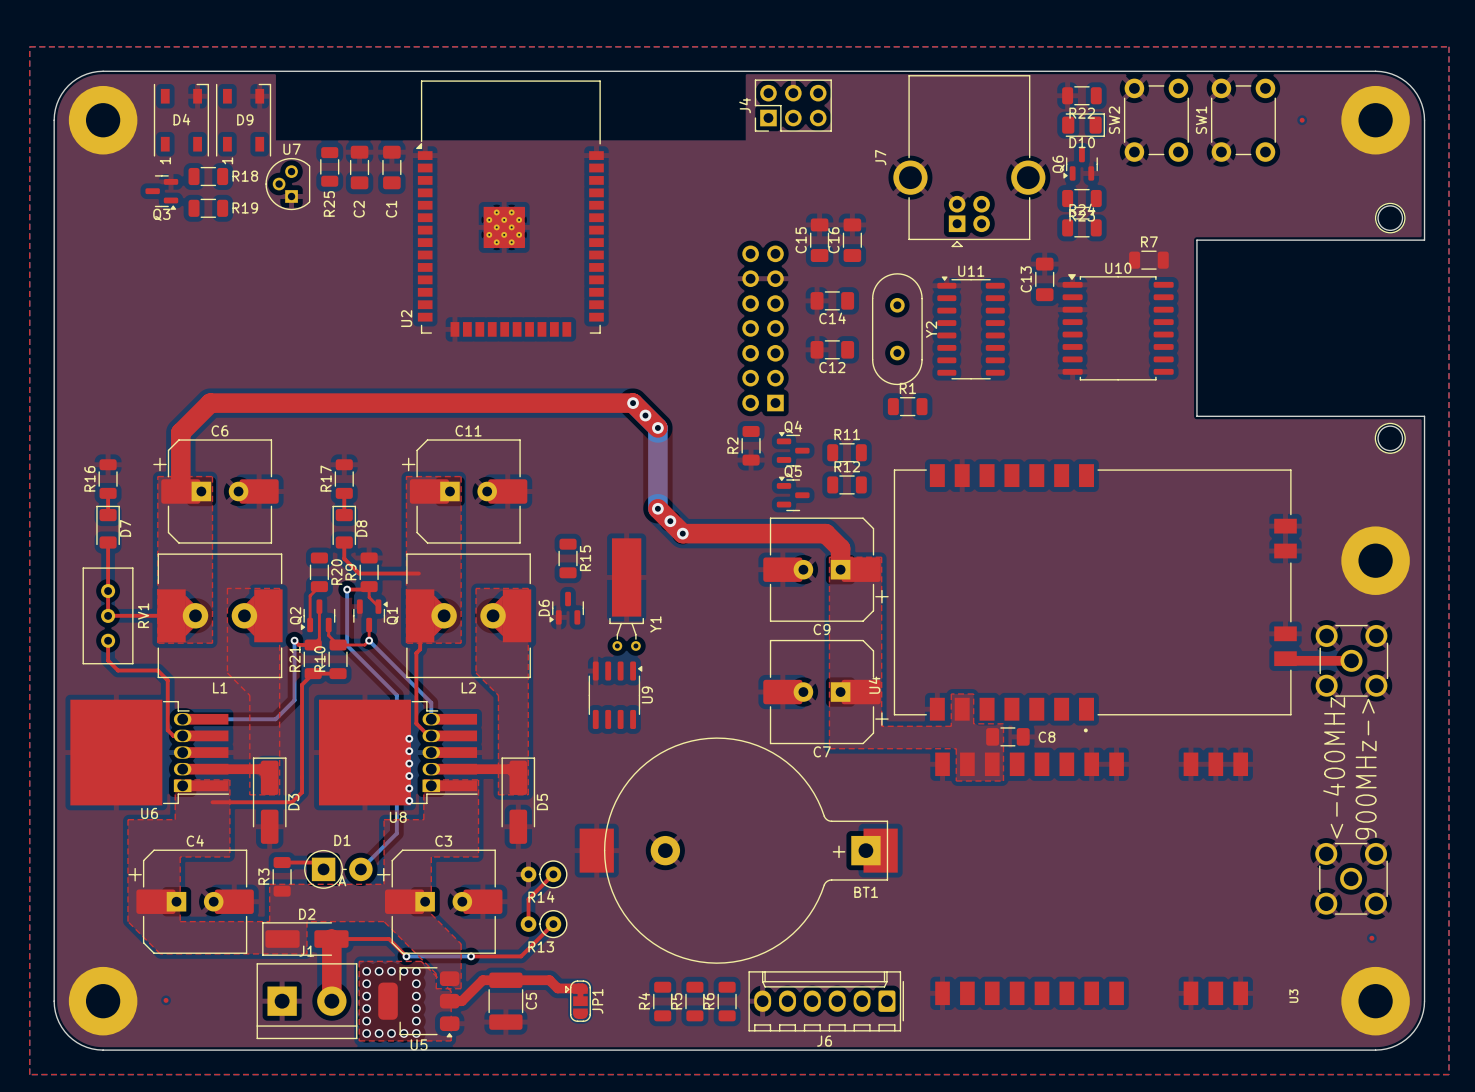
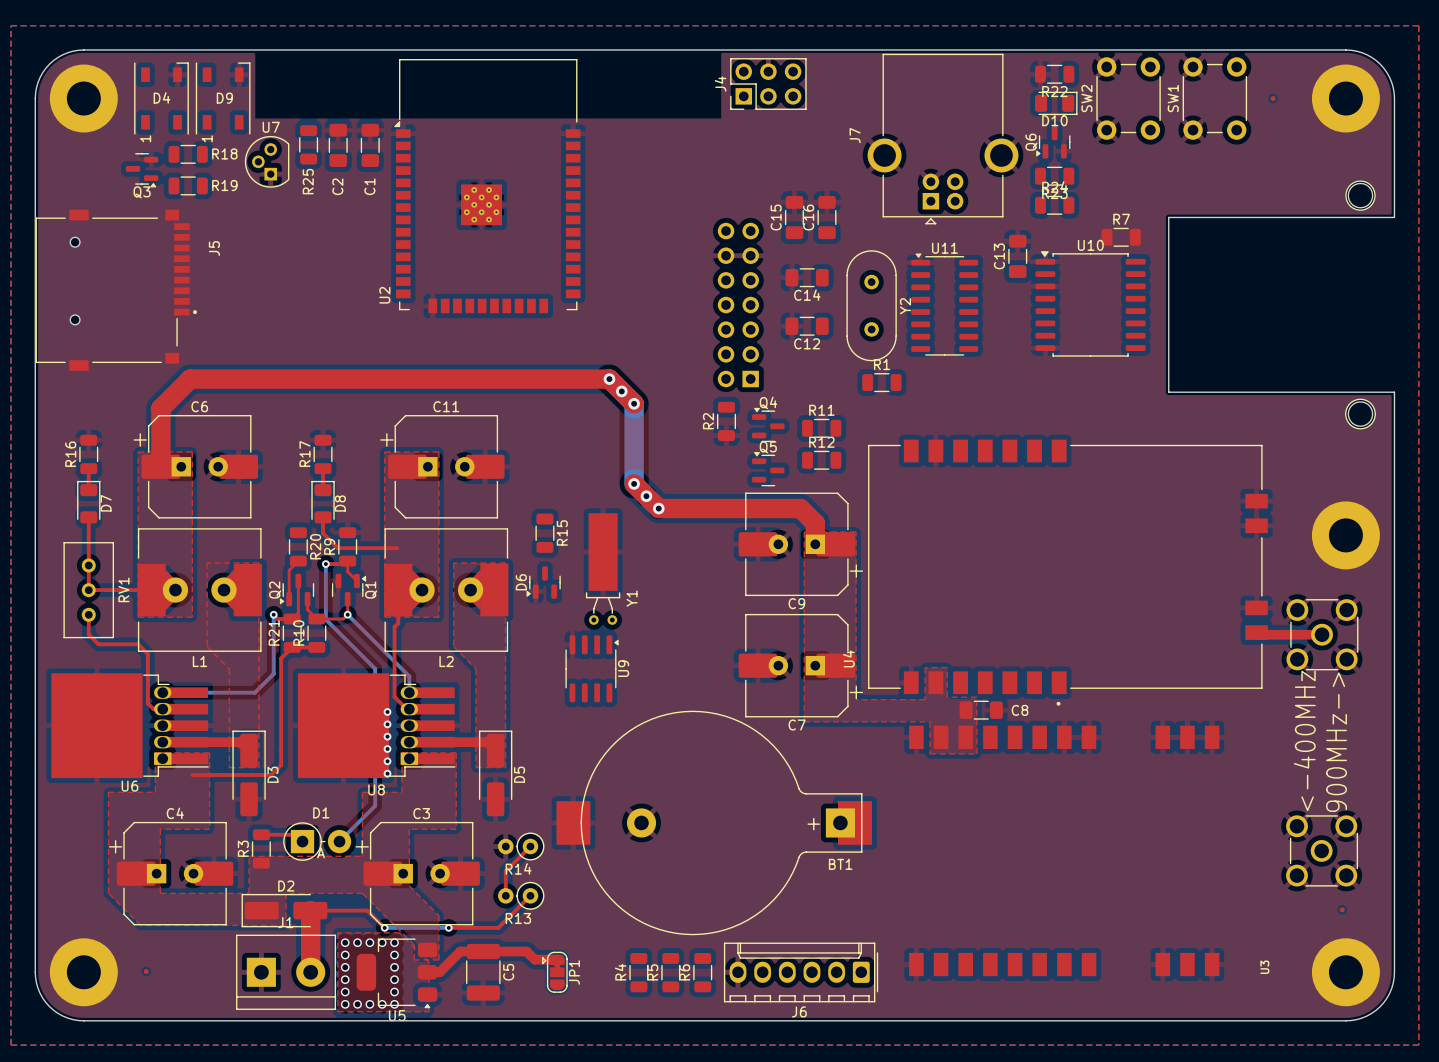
J5: none -> (116, 290)

